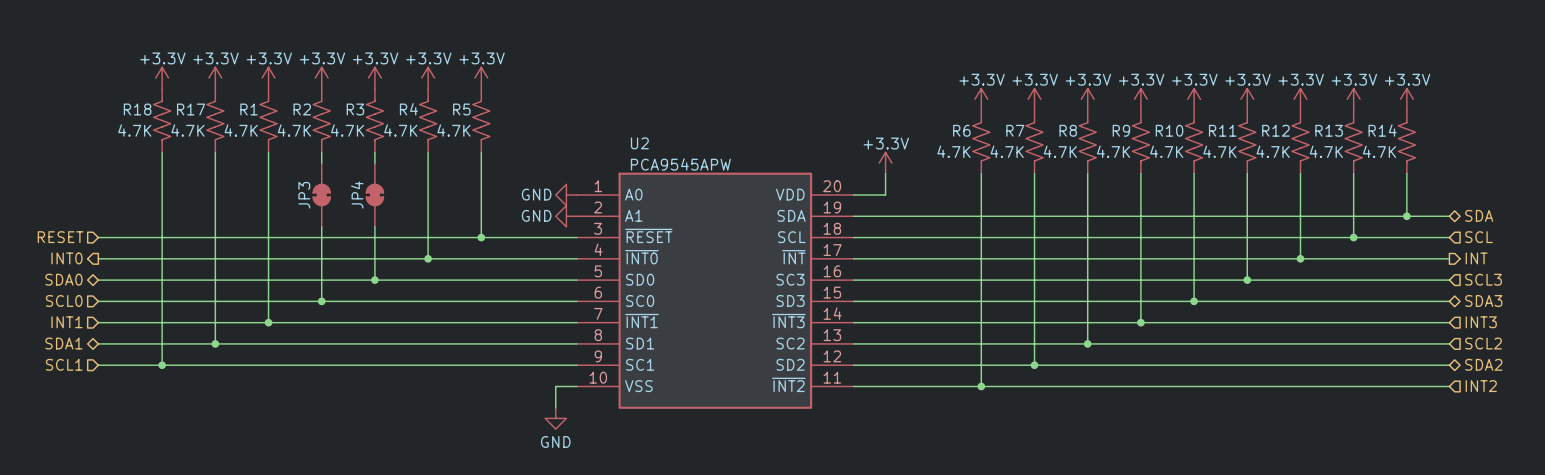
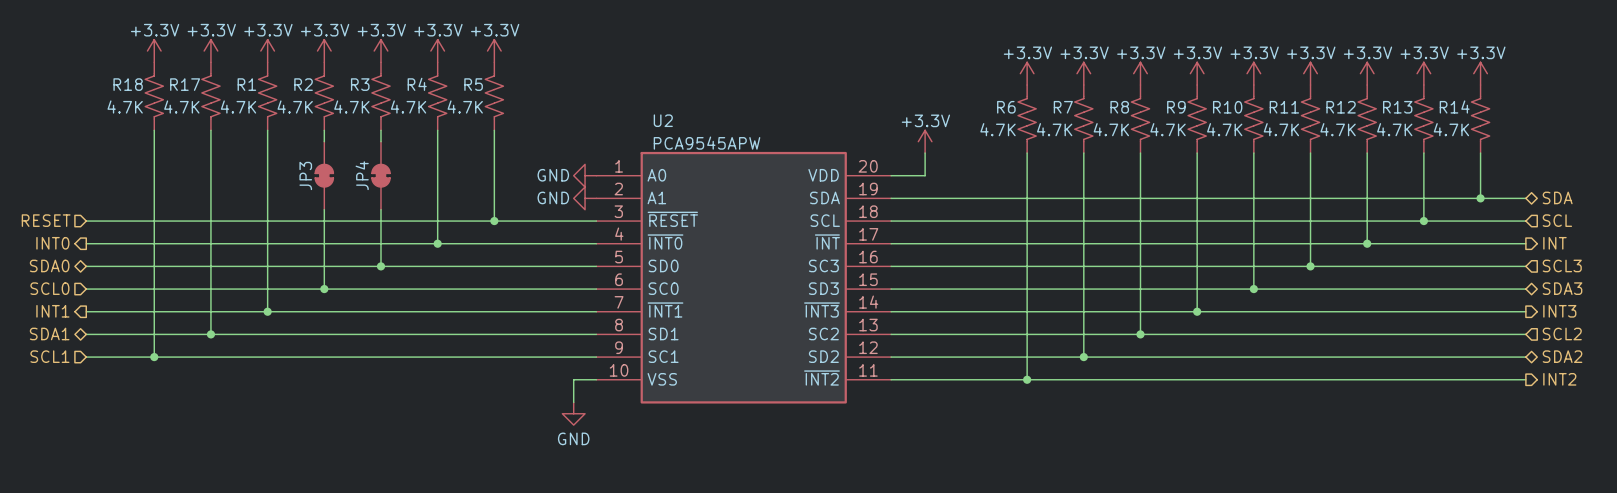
hierarchical label shape: input (66, 322) -> output (52, 311)
hierarchical label shape: input (1481, 322) -> output (1559, 311)
hierarchical label shape: input (1481, 386) -> output (1559, 379)

